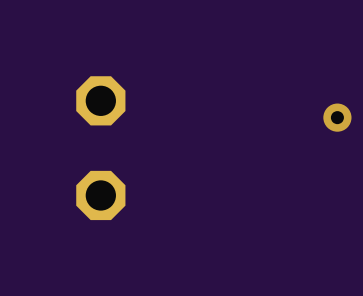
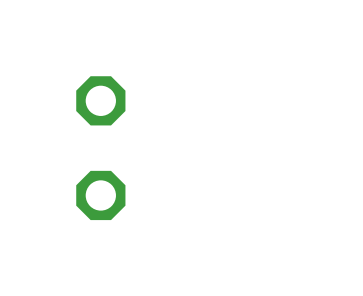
via: (337, 117) -> none

